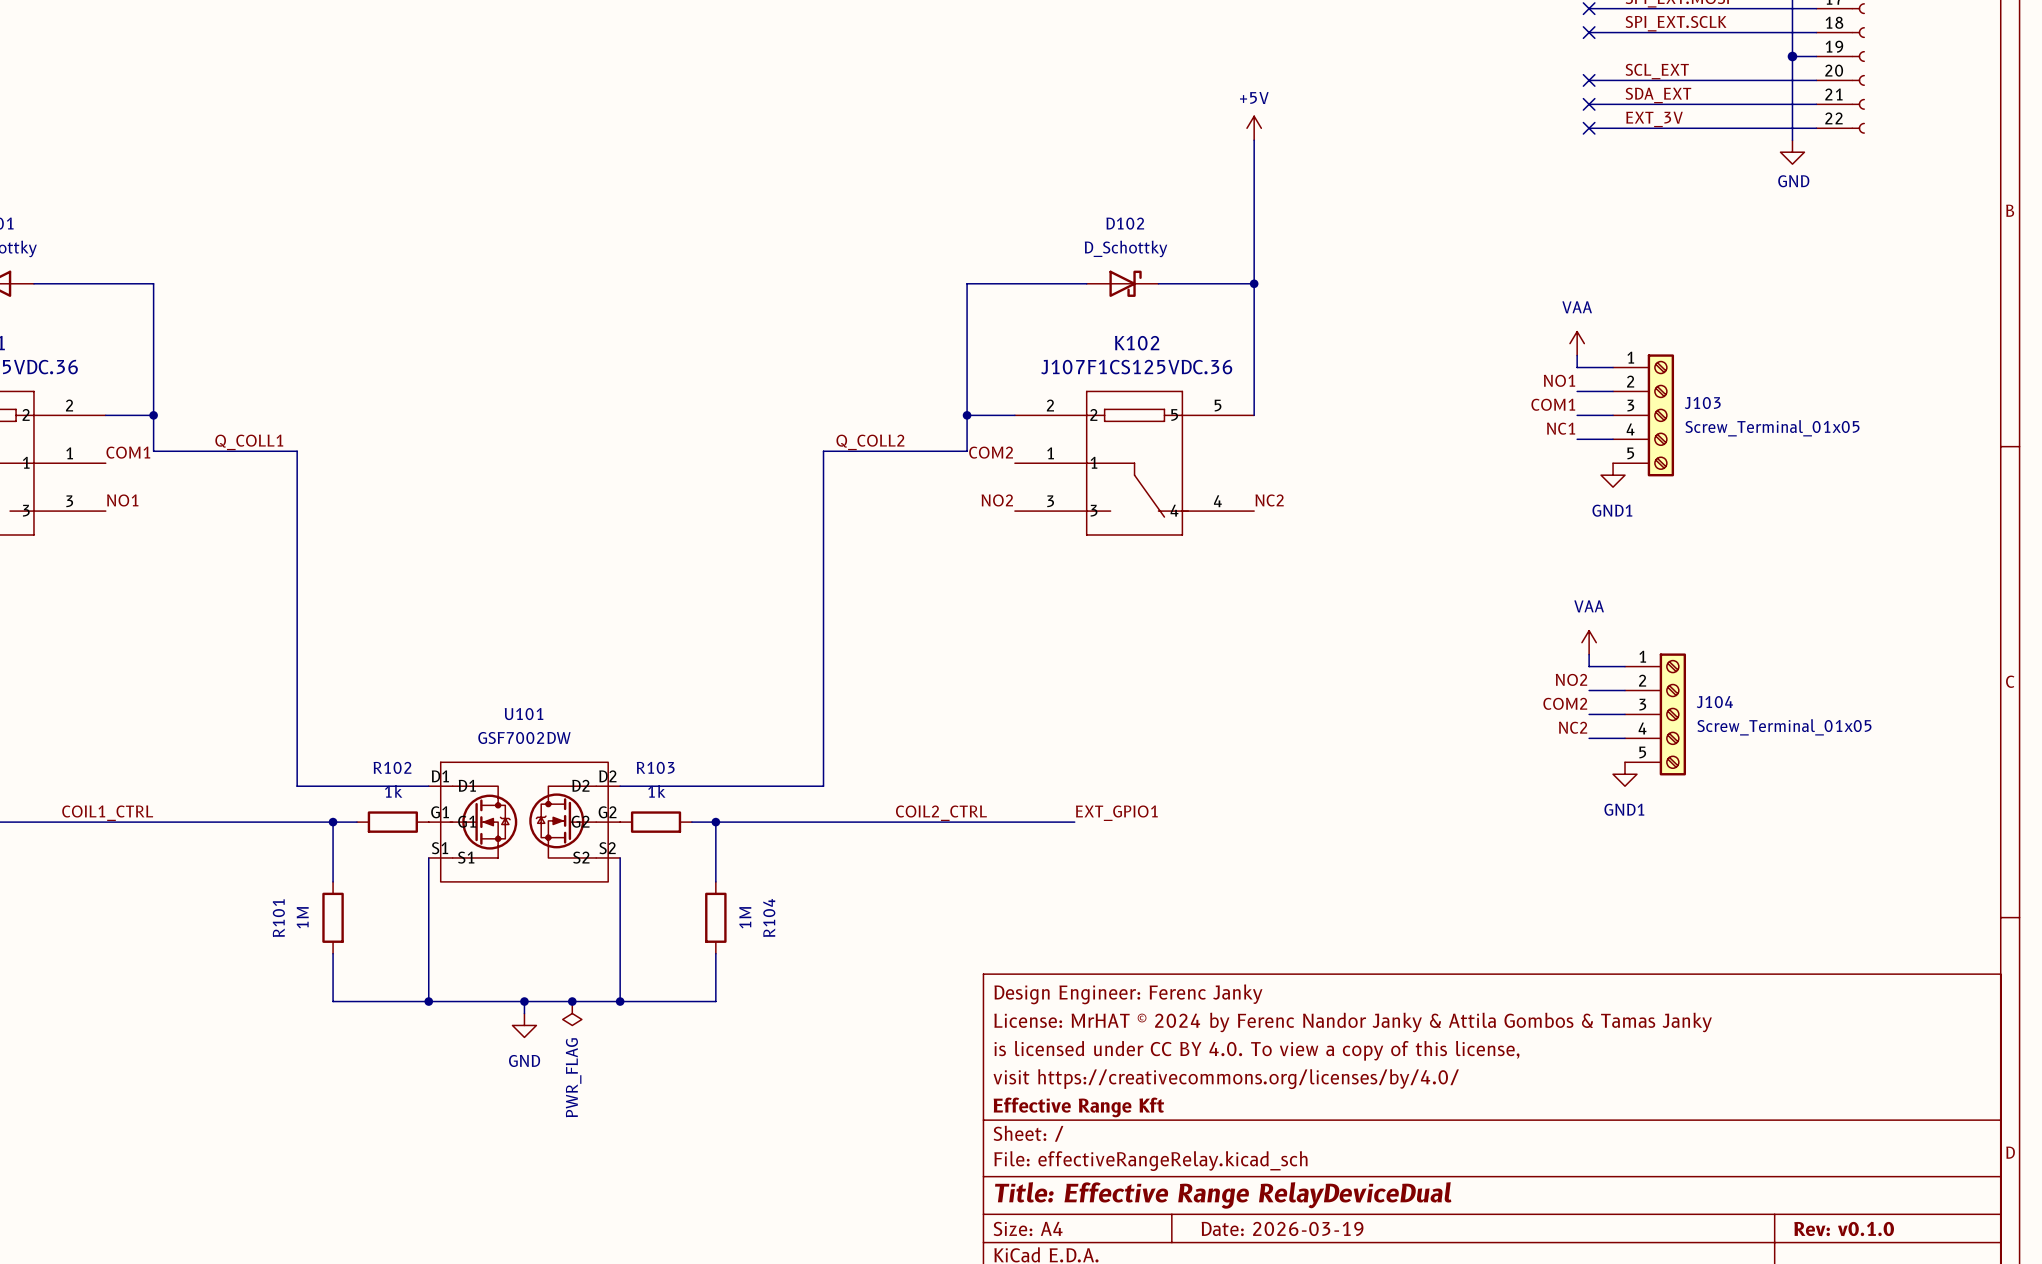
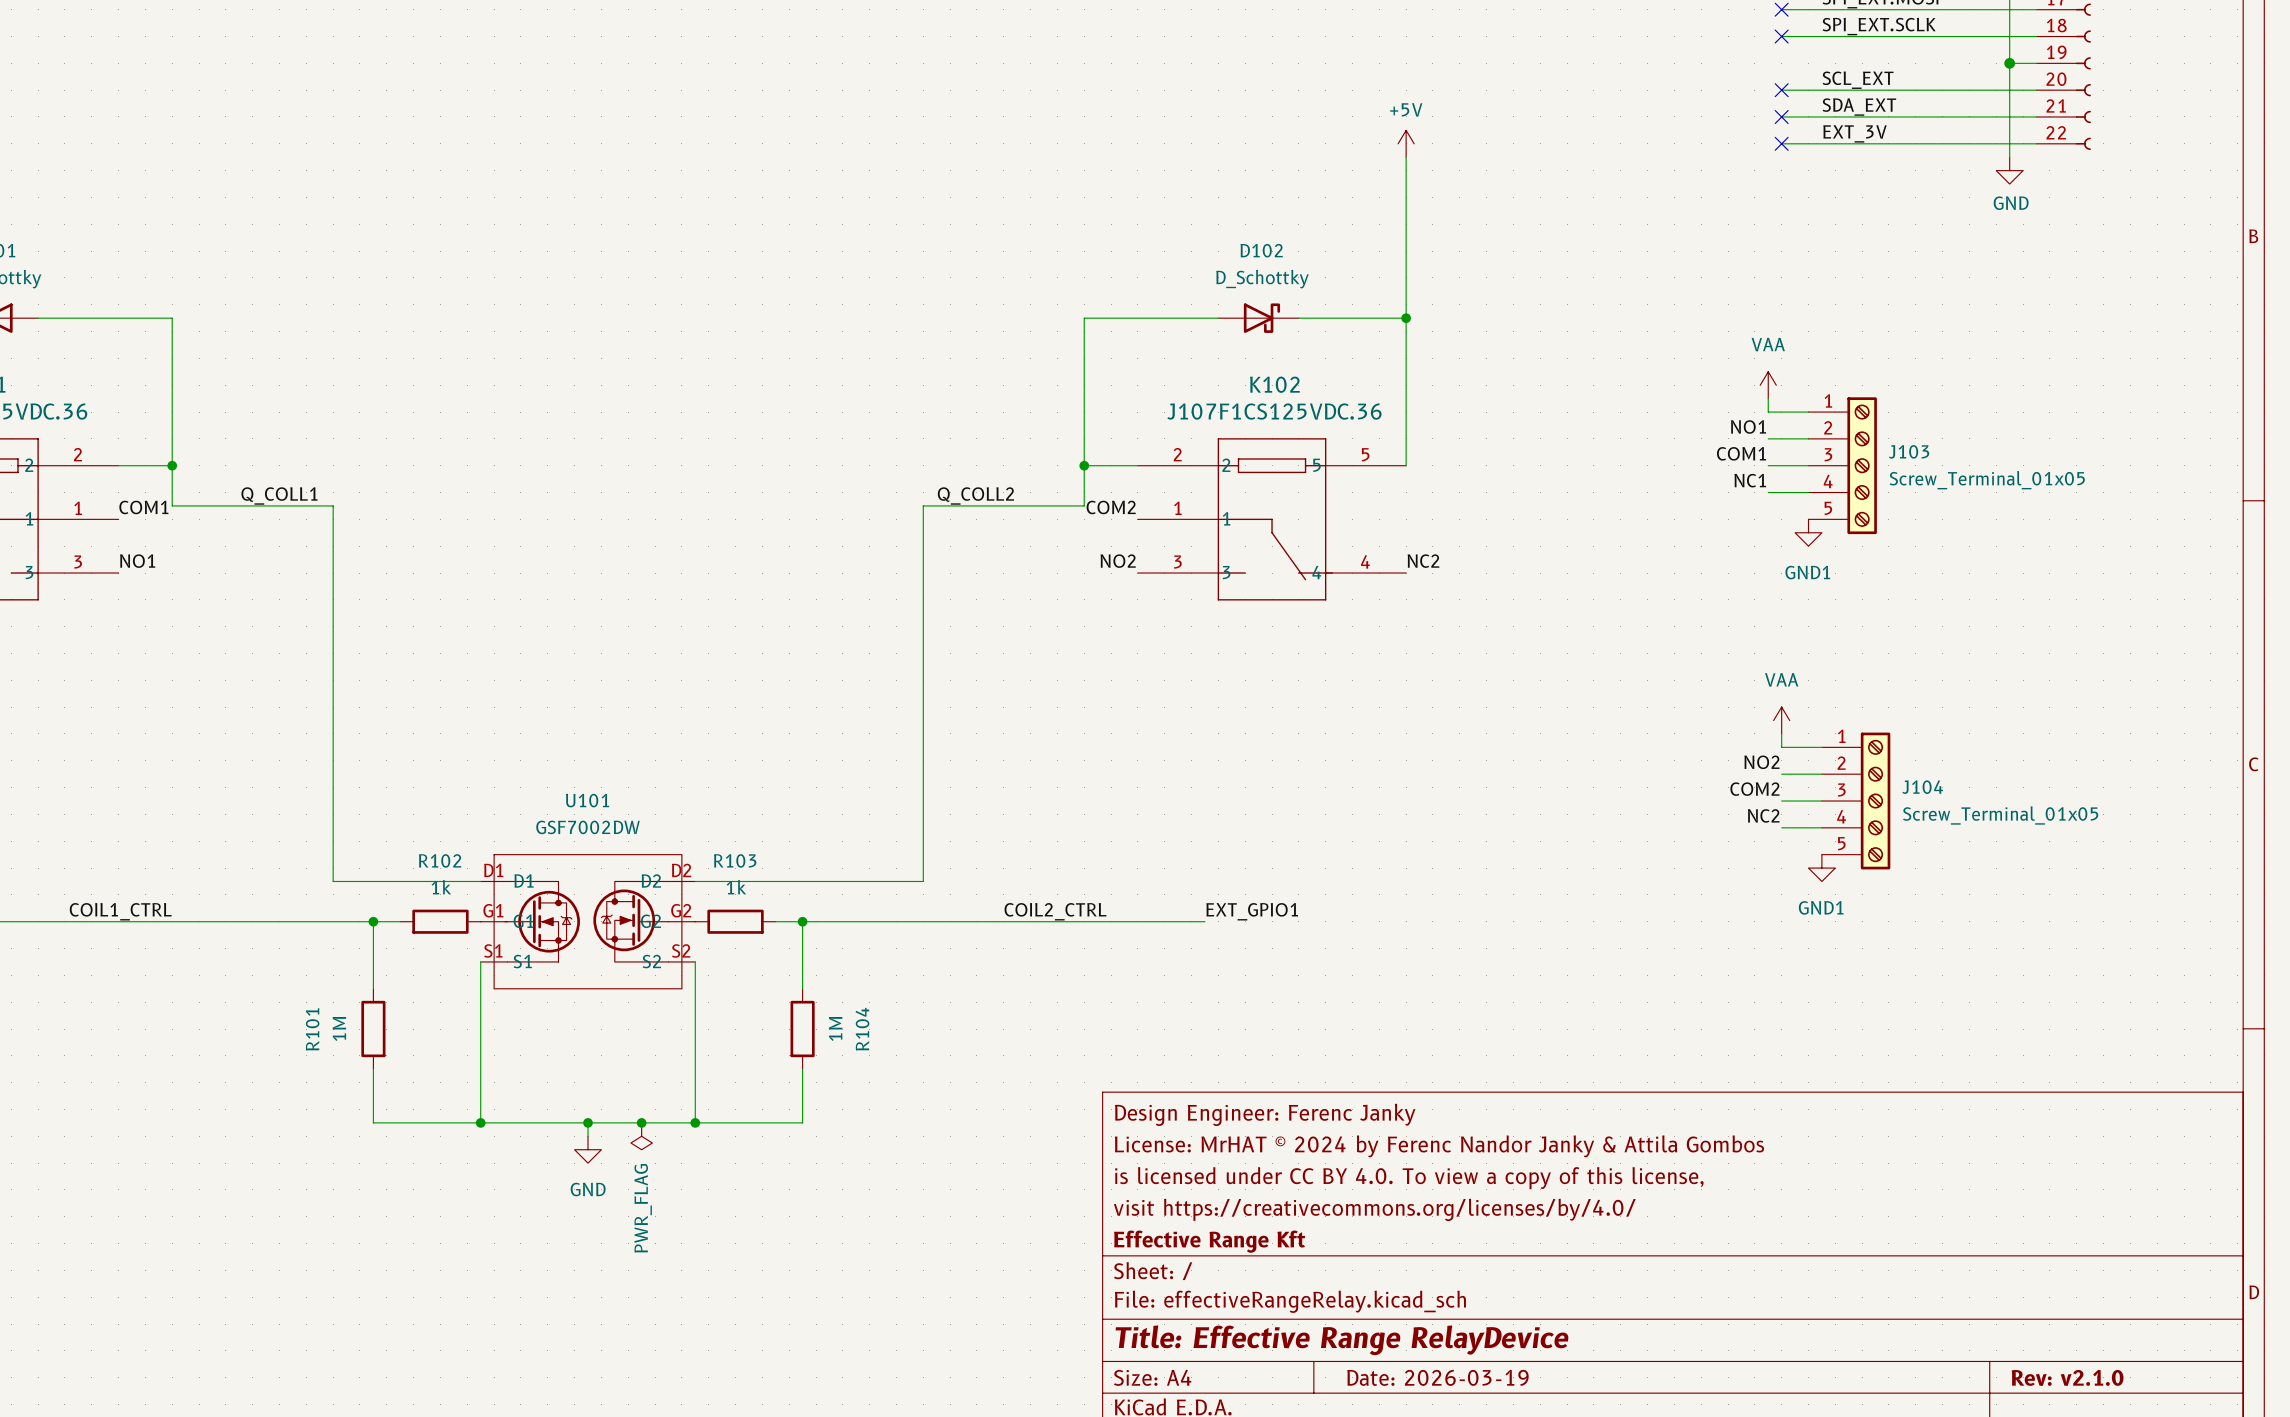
title block: License: MrHAT © 2024 by Ferenc Nandor Janky & Attila Gombos & Tamas Janky (1353, 1022) -> License: MrHAT © 2024 by Ferenc Nandor Janky & Attila Gombos (1439, 1146)
title block: Title: Effective Range RelayDeviceDual (1223, 1195) -> Title: Effective Range RelayDevice (1342, 1340)
title block: Rev: v0.1.0 (1844, 1228) -> Rev: v2.1.0 (2067, 1377)

